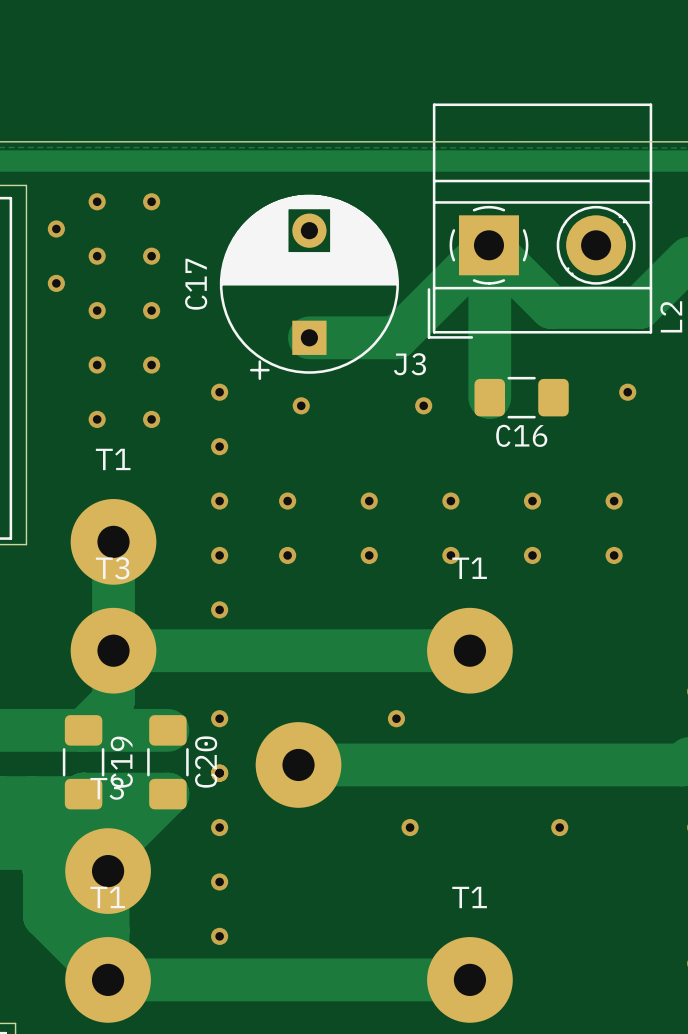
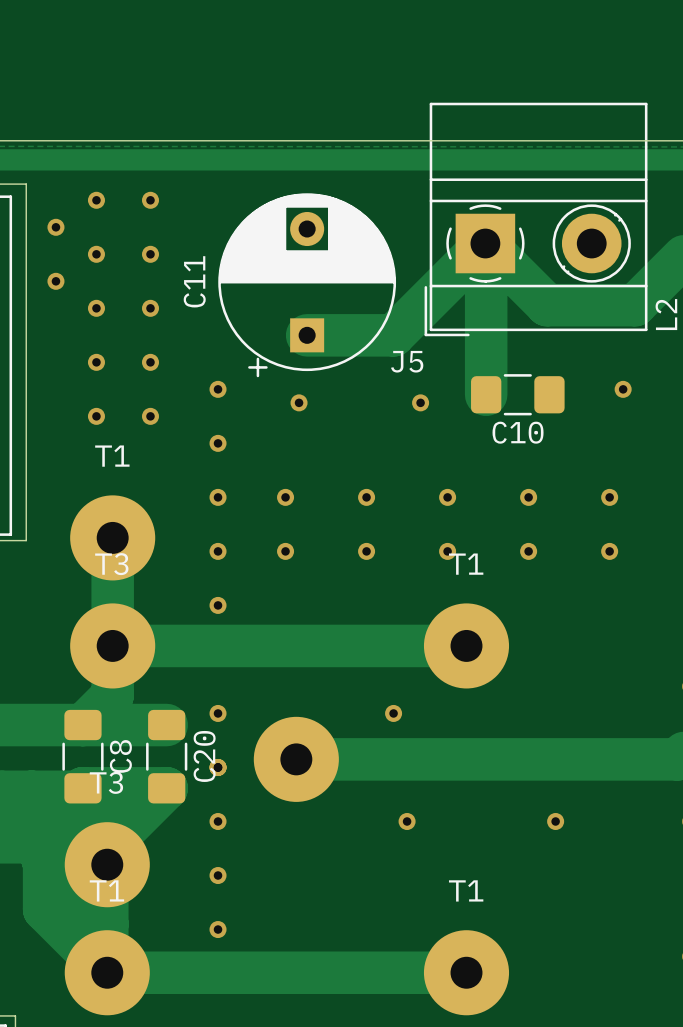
C17 name: C17 (196, 284) -> C11 (194, 281)
J3 name: J3 (409, 364) -> J5 (407, 361)
C16 name: C16 (521, 435) -> C10 (518, 432)
C19 name: C19 (121, 762) -> C8 (120, 756)

